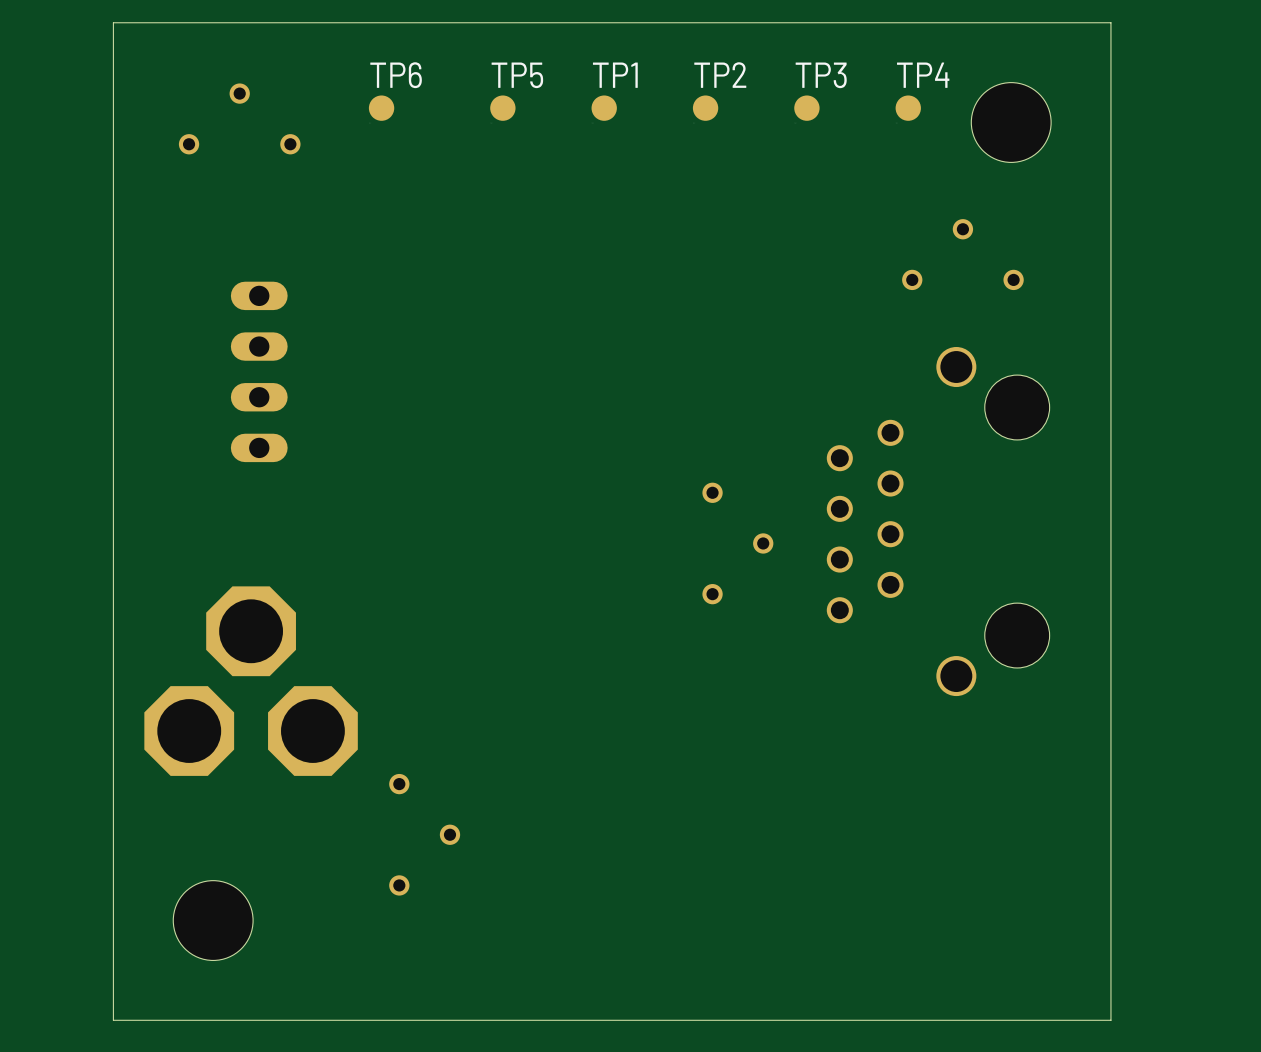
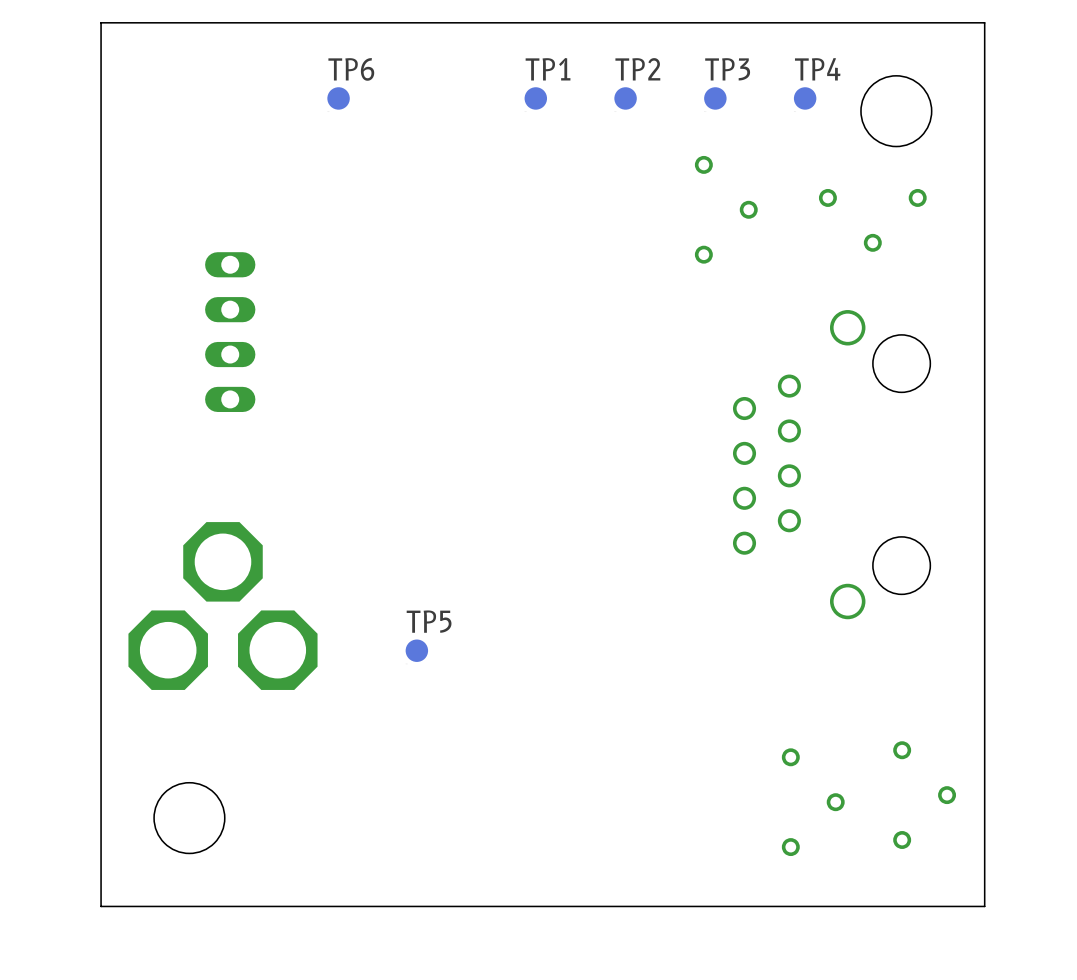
TP5 position: (502, 108) -> (416, 650)
part: (239, 118) -> none
part: none -> (726, 209)
part rotation: 0° (962, 254) -> 180° (872, 220)
part: (737, 543) -> none
part: (424, 834) -> none
part: none -> (924, 795)
part: none -> (813, 802)

